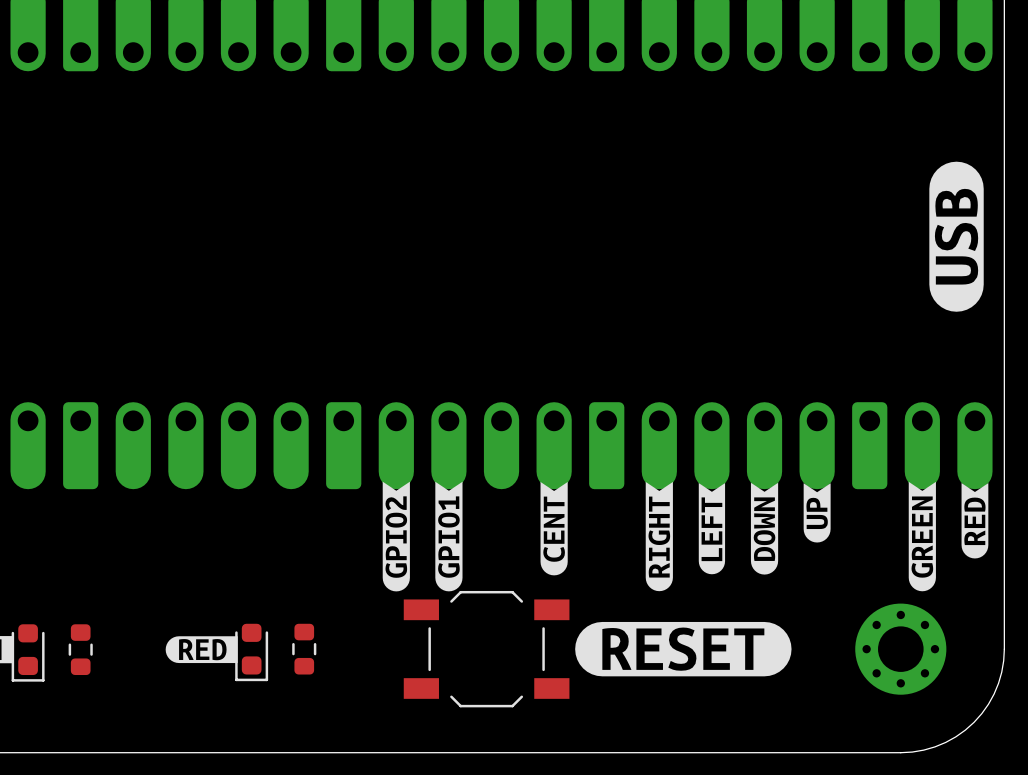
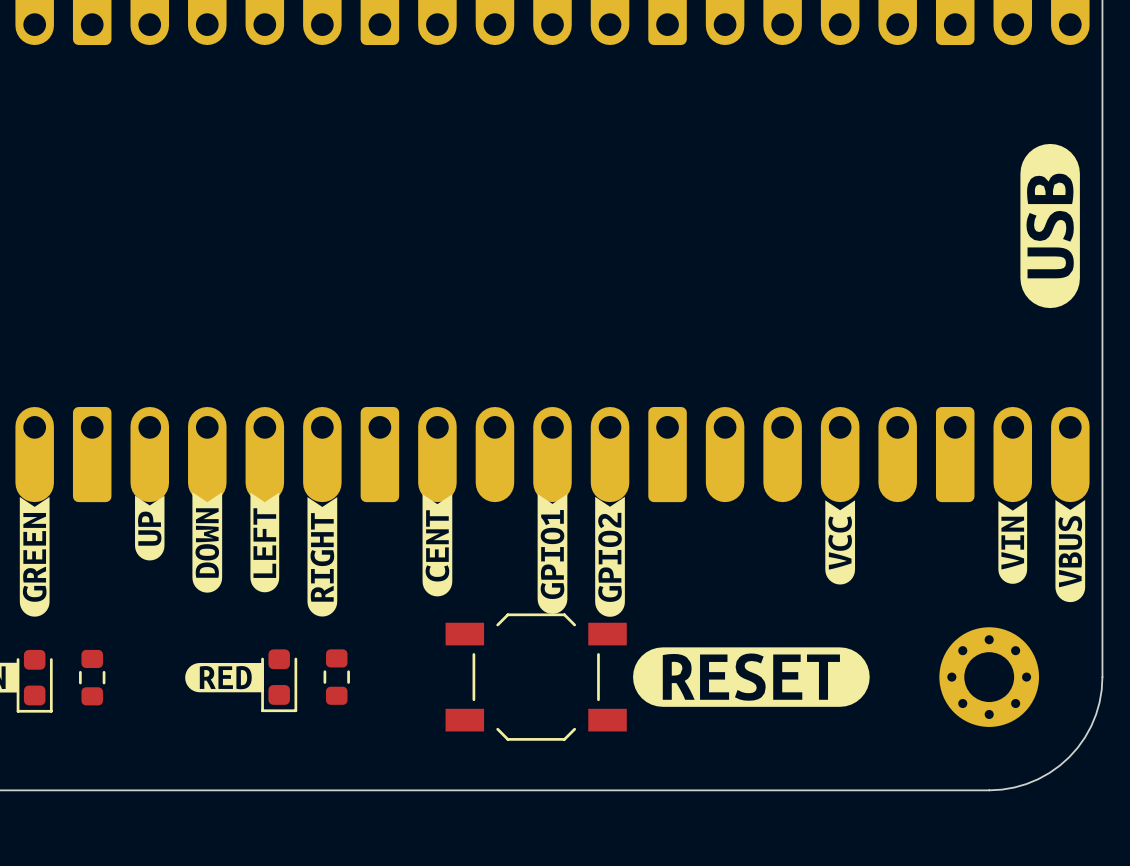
drawing: none -> [192, 492, 223, 593]
drawing shape: [908, 481, 936, 592] -> [998, 501, 1028, 584]
drawing shape: [750, 482, 779, 575] -> [825, 500, 856, 585]
drawing: none -> [135, 495, 165, 561]
drawing: [803, 483, 831, 543] -> none
drawing shape: [961, 483, 989, 559] -> [1055, 500, 1086, 603]
drawing: none -> [19, 496, 50, 617]
drawing position: (554, 528) -> (437, 545)
drawing position: (711, 528) -> (264, 542)
drawing position: (396, 536) -> (610, 556)
drawing position: (448, 536) -> (552, 553)
drawing position: (659, 536) -> (322, 556)

